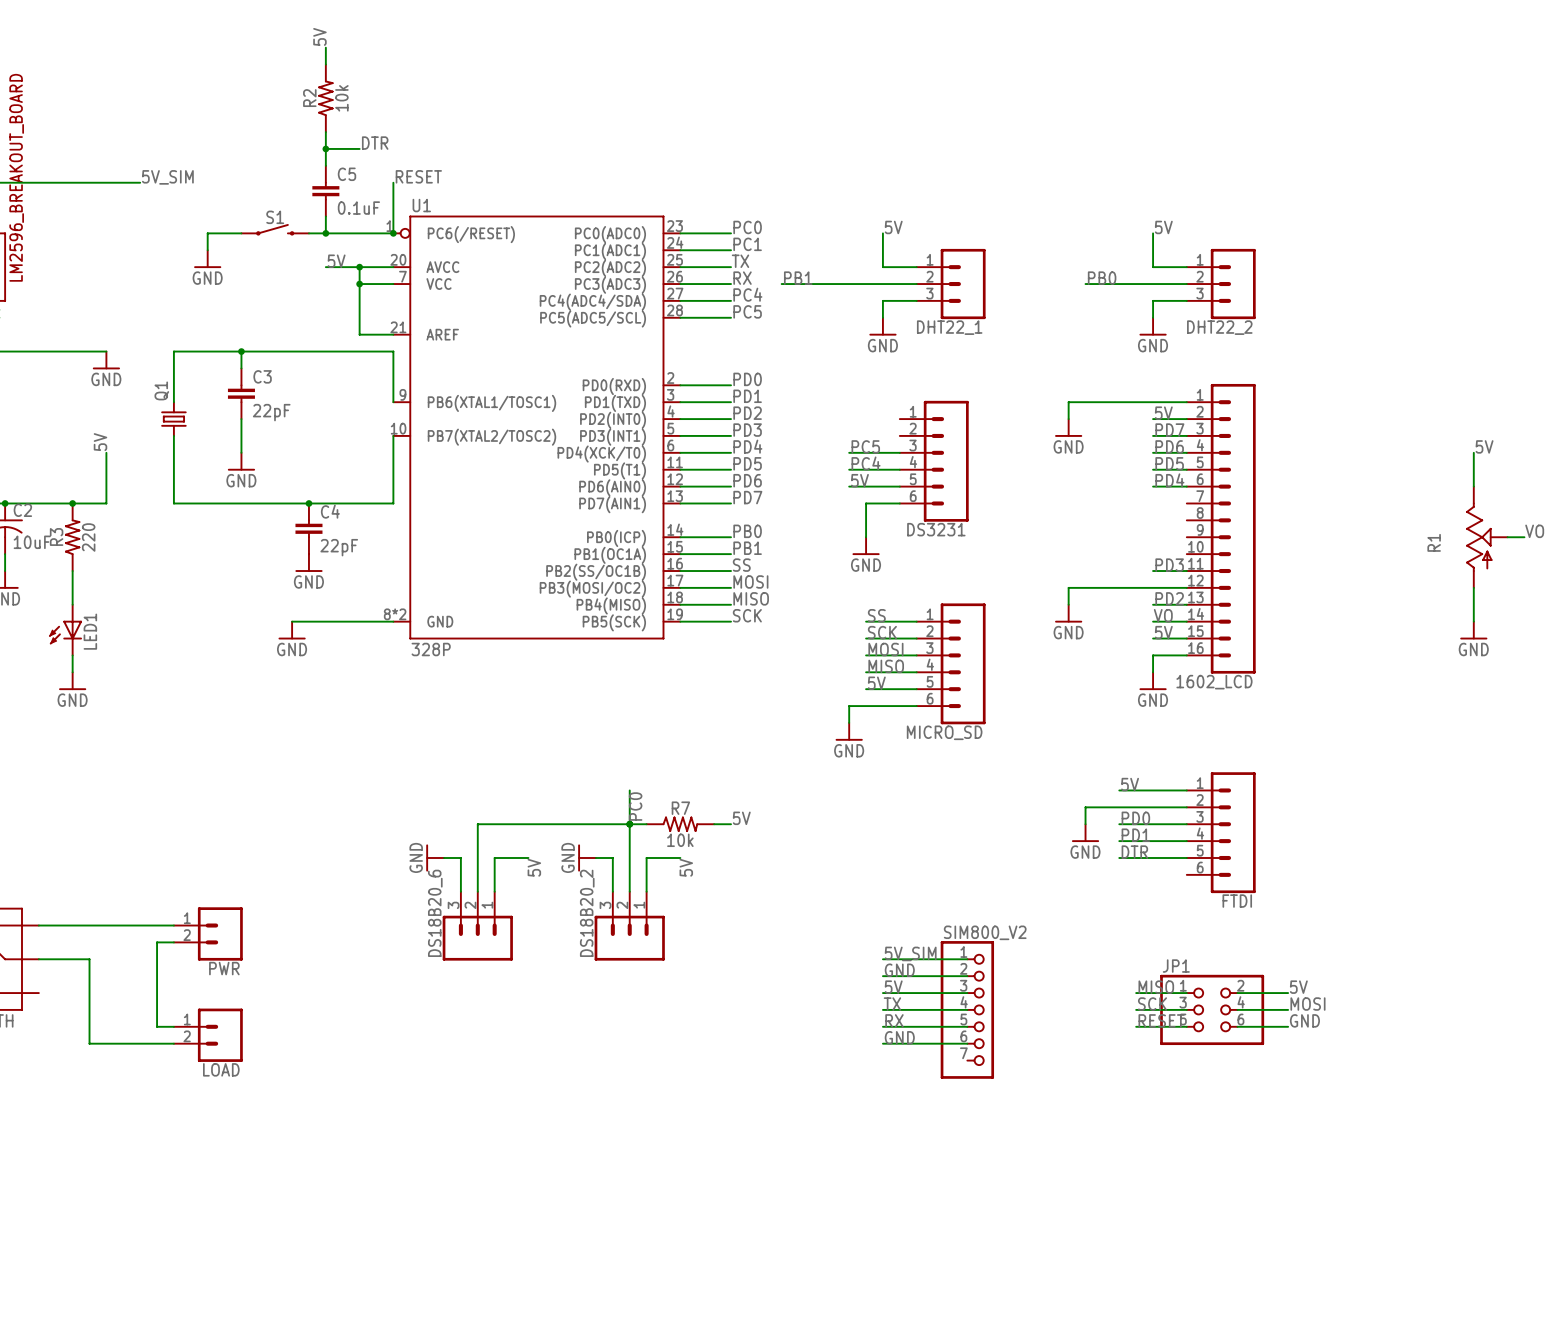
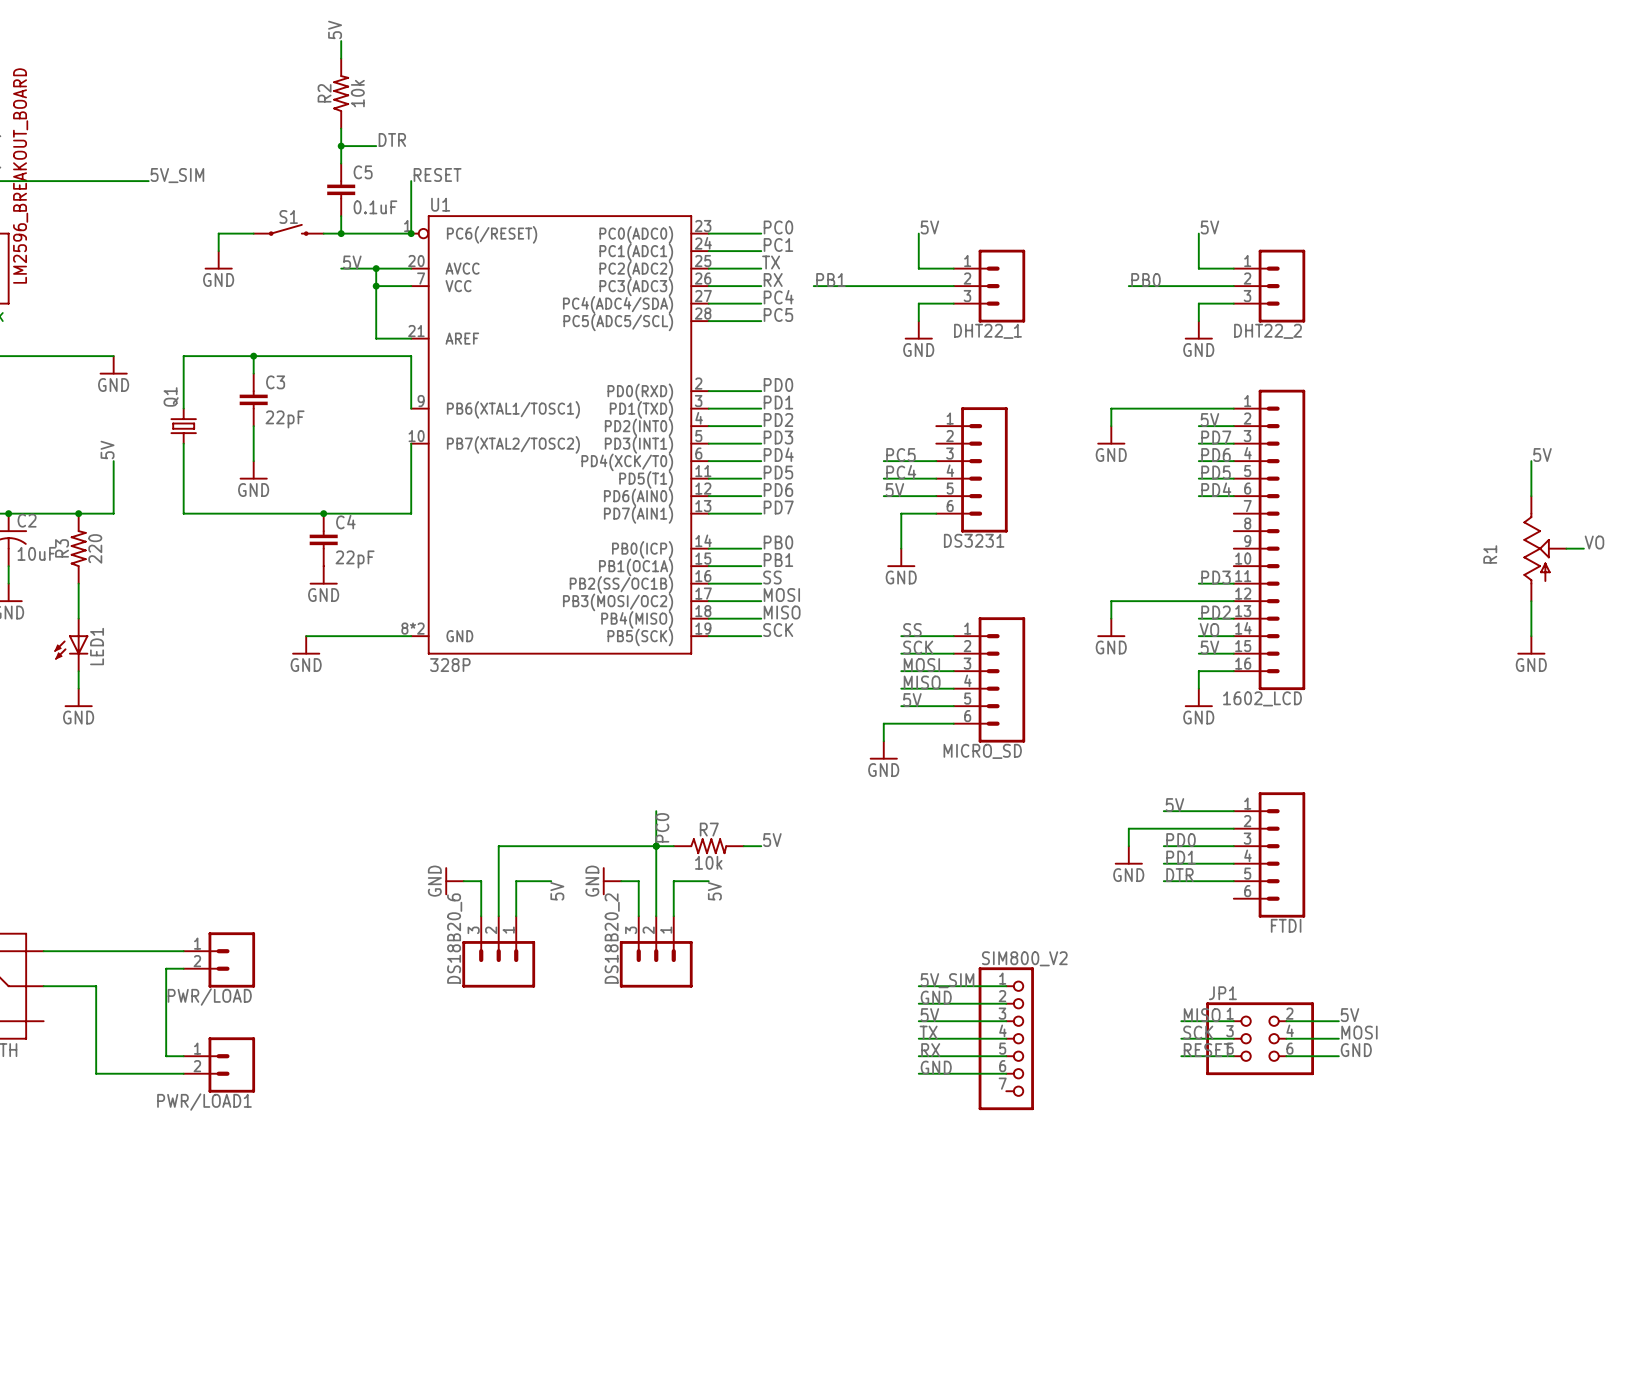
PWR name: PWR (224, 968) -> PWR/LOAD (209, 997)
LOAD name: LOAD (221, 1069) -> PWR/LOAD1 (204, 1102)

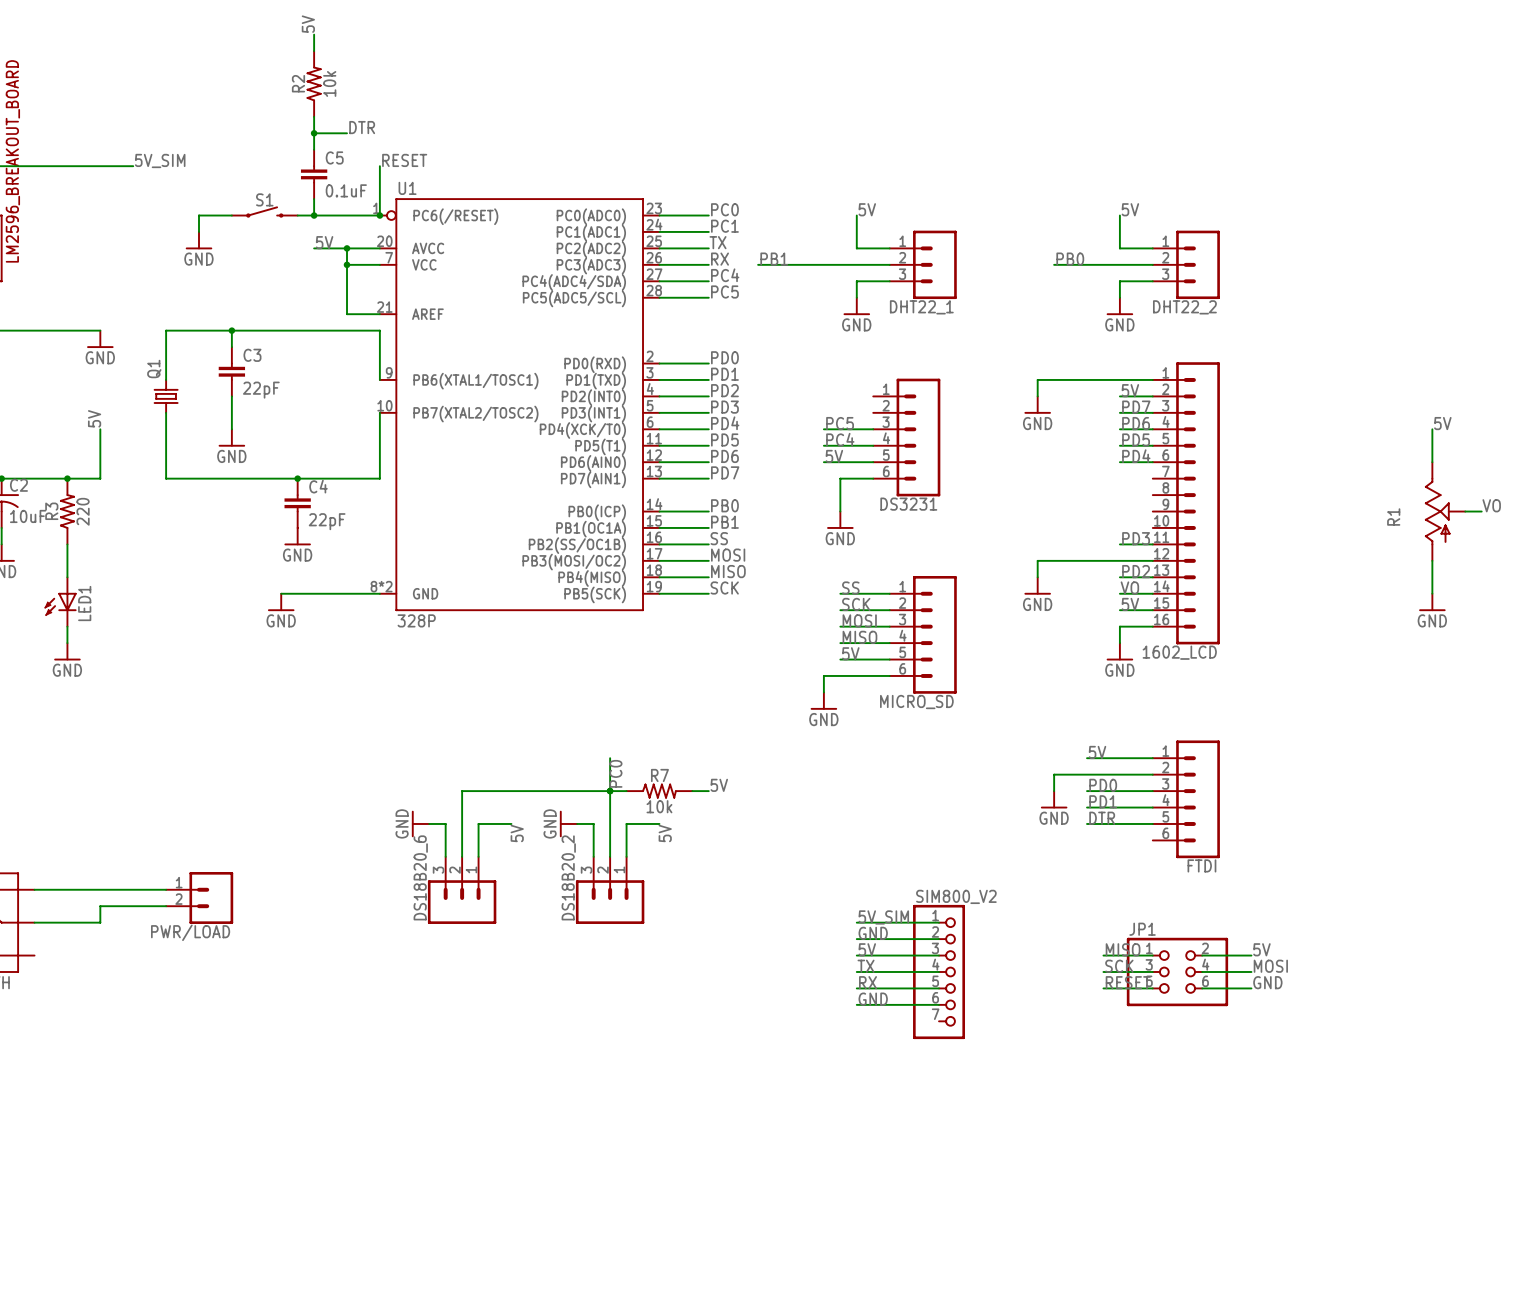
wire: (166, 968) (166, 1056) (183, 1056) -> none
wire: (96, 986) (96, 1073) (183, 1073) -> (83, 922) (100, 922) (100, 906) (149, 906)
PWR/LOAD1: (219, 1064) -> none

